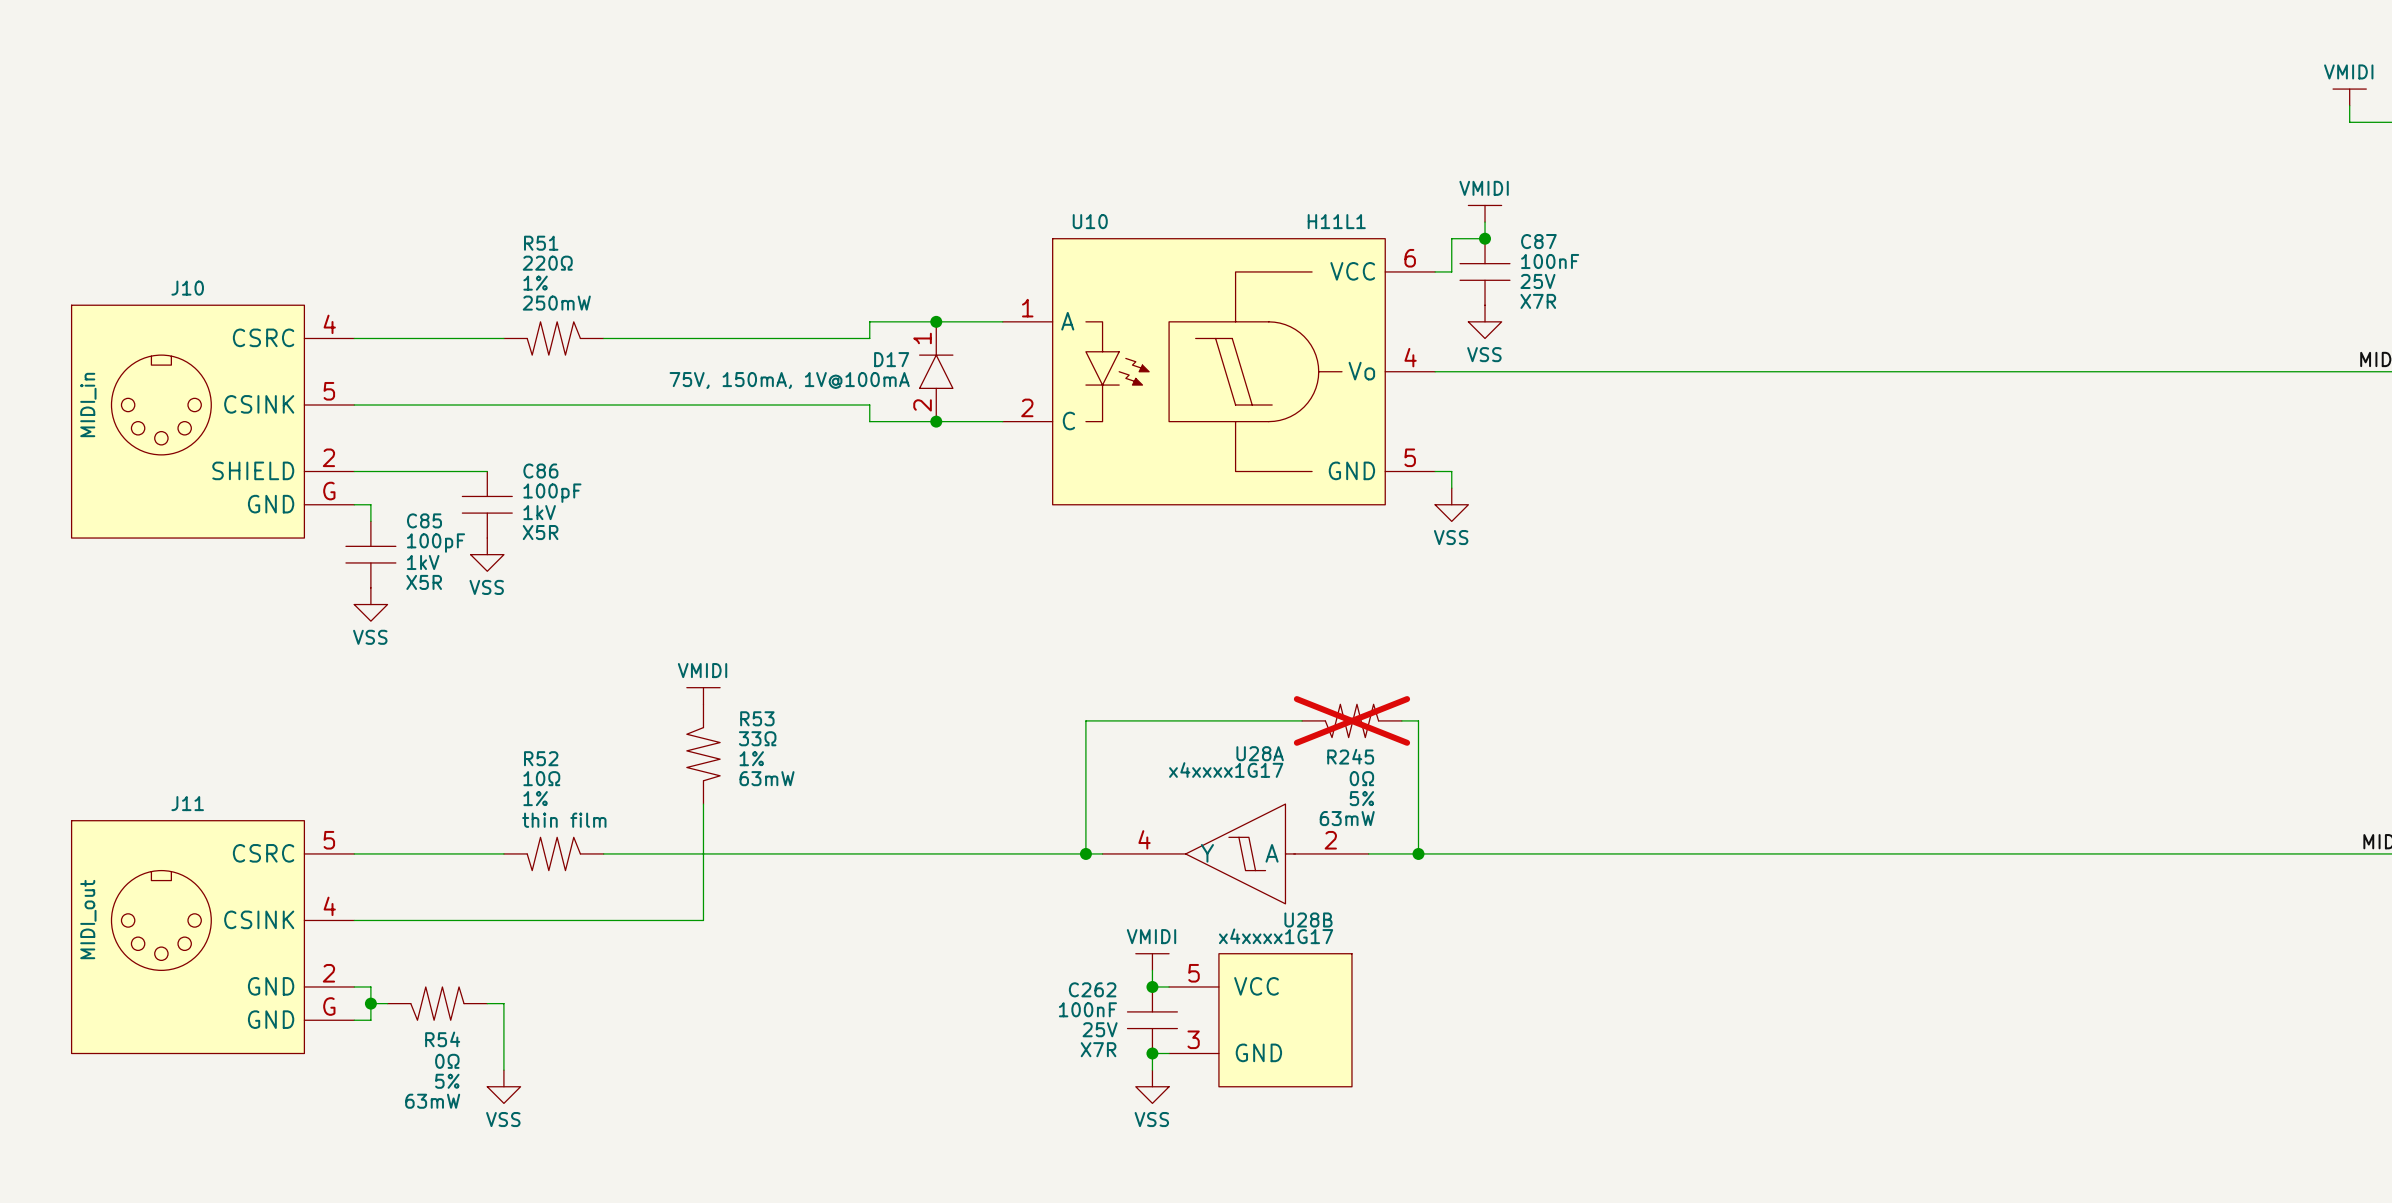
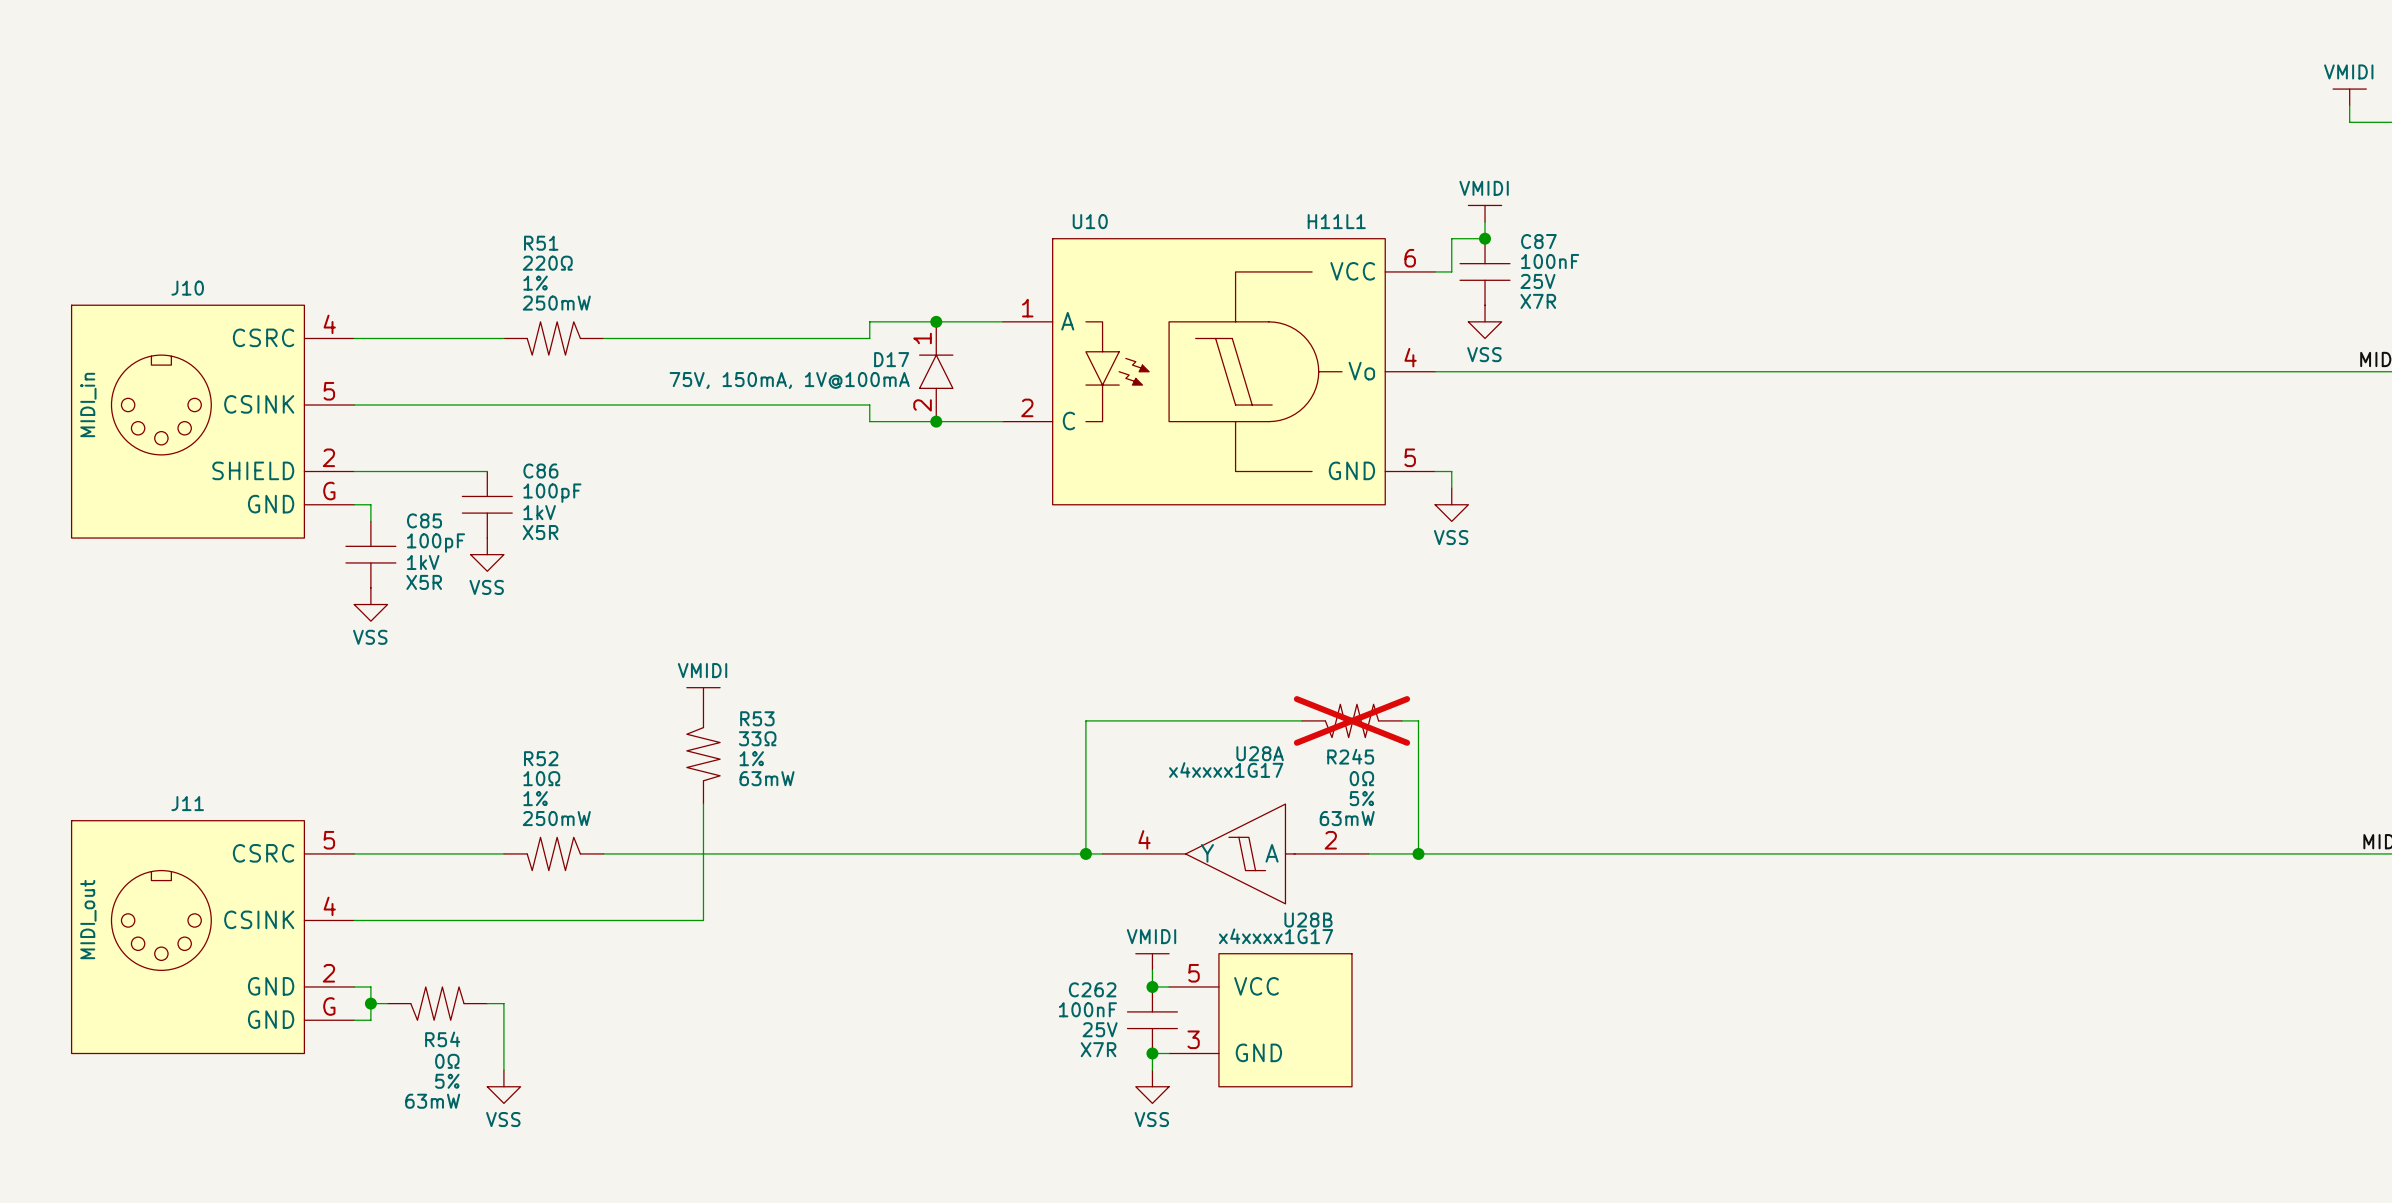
R52 text: none -> 250mW (556, 818)
R52 text: thin film (564, 820) -> none

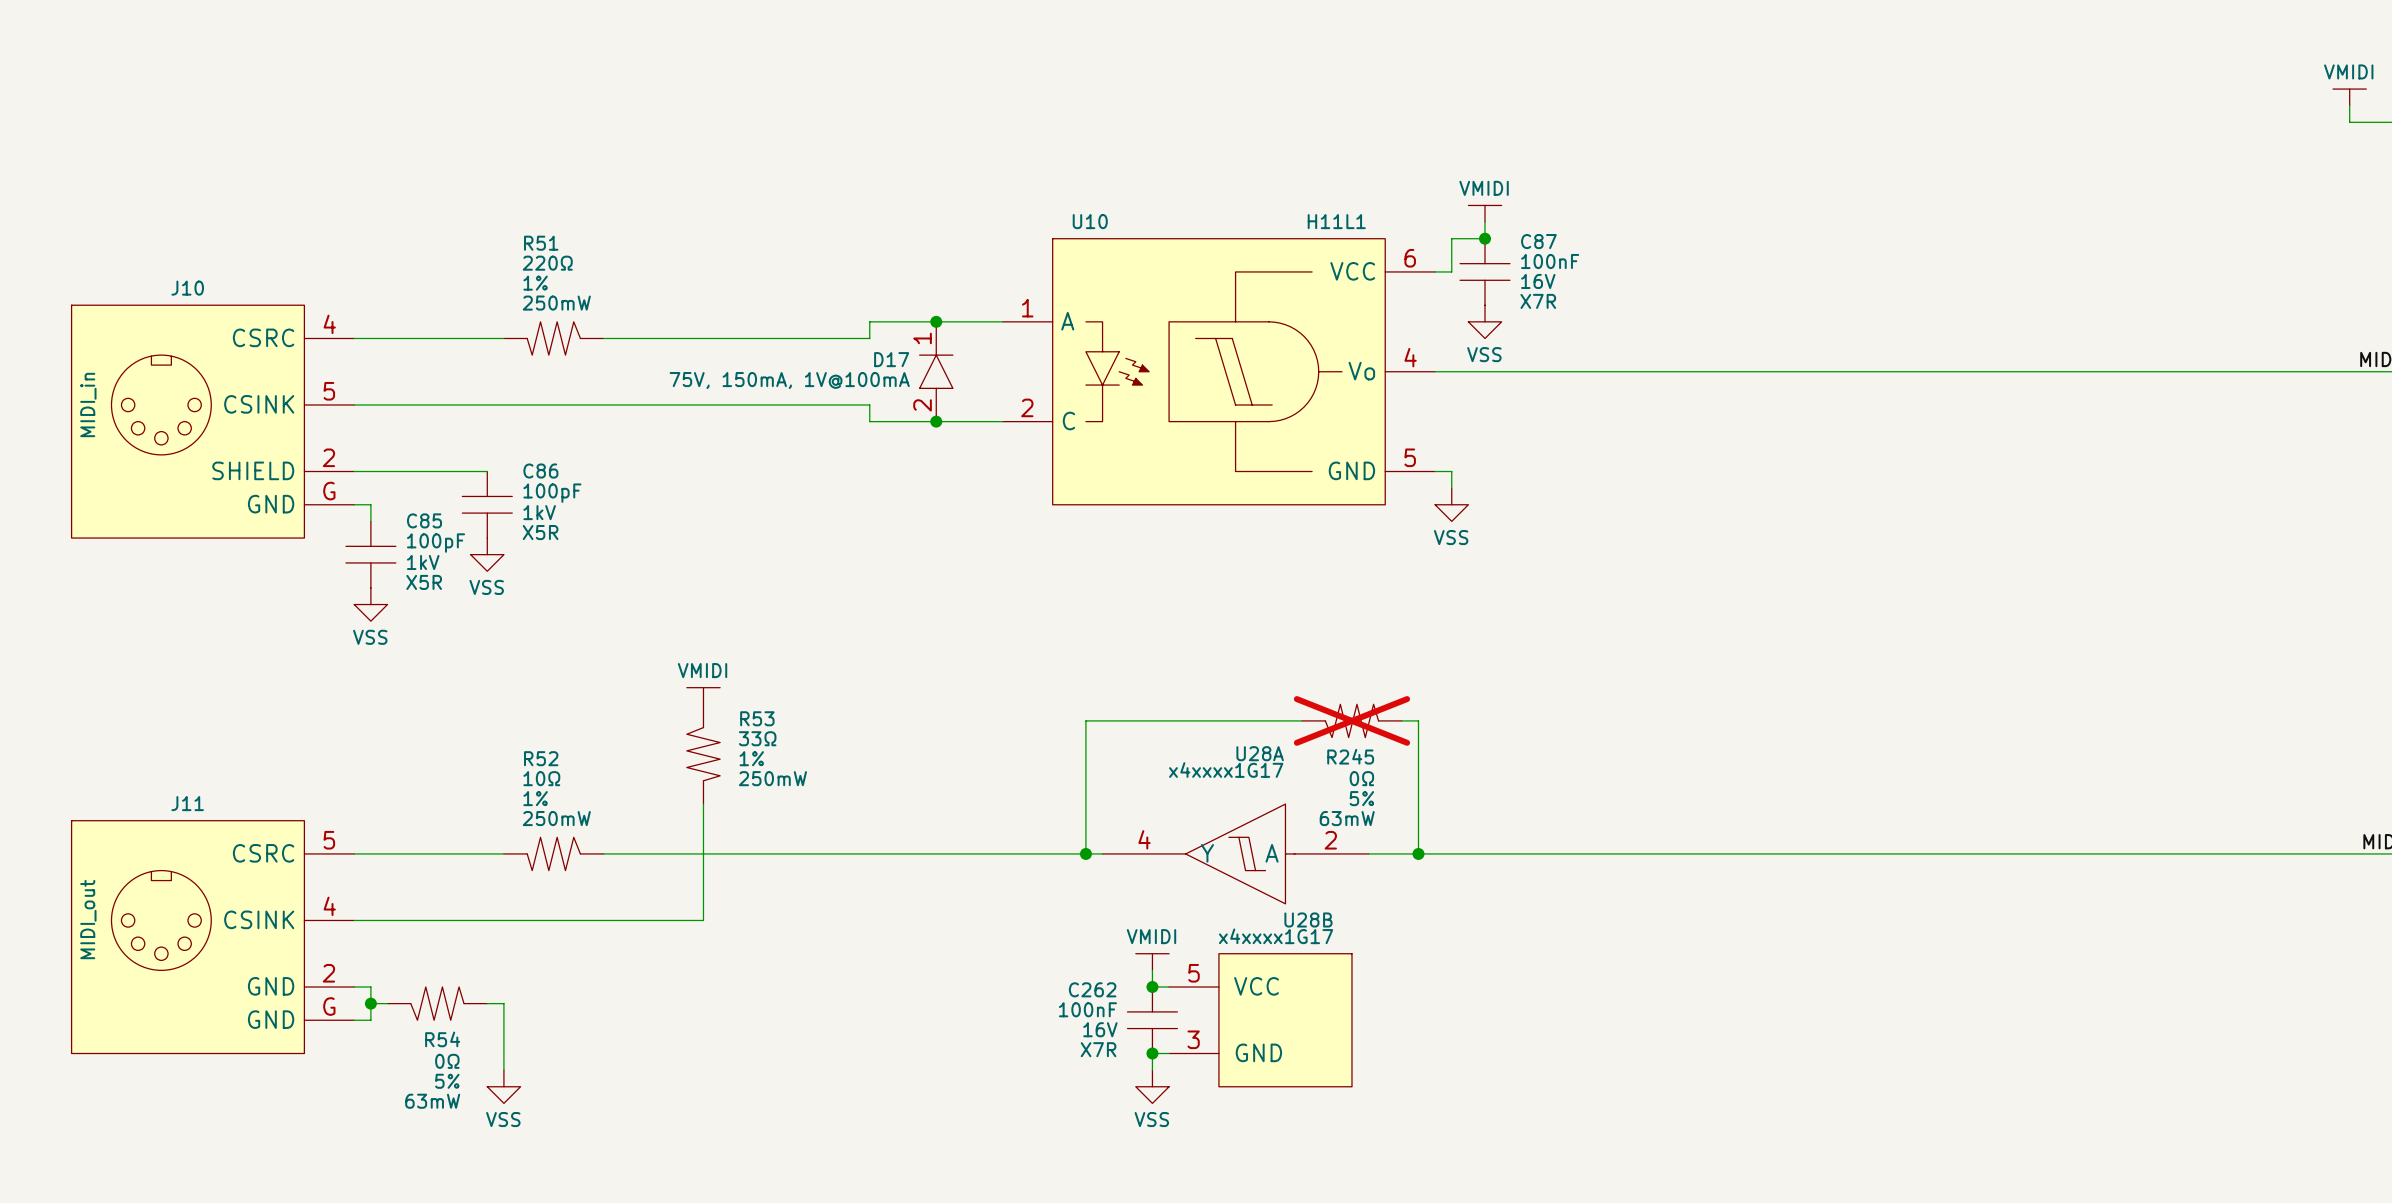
C87 text: 25V (1537, 281) -> 16V (1538, 281)
R53 text: 63mW (767, 778) -> 250mW (772, 778)
C262 text: 25V (1100, 1029) -> 16V (1100, 1029)

